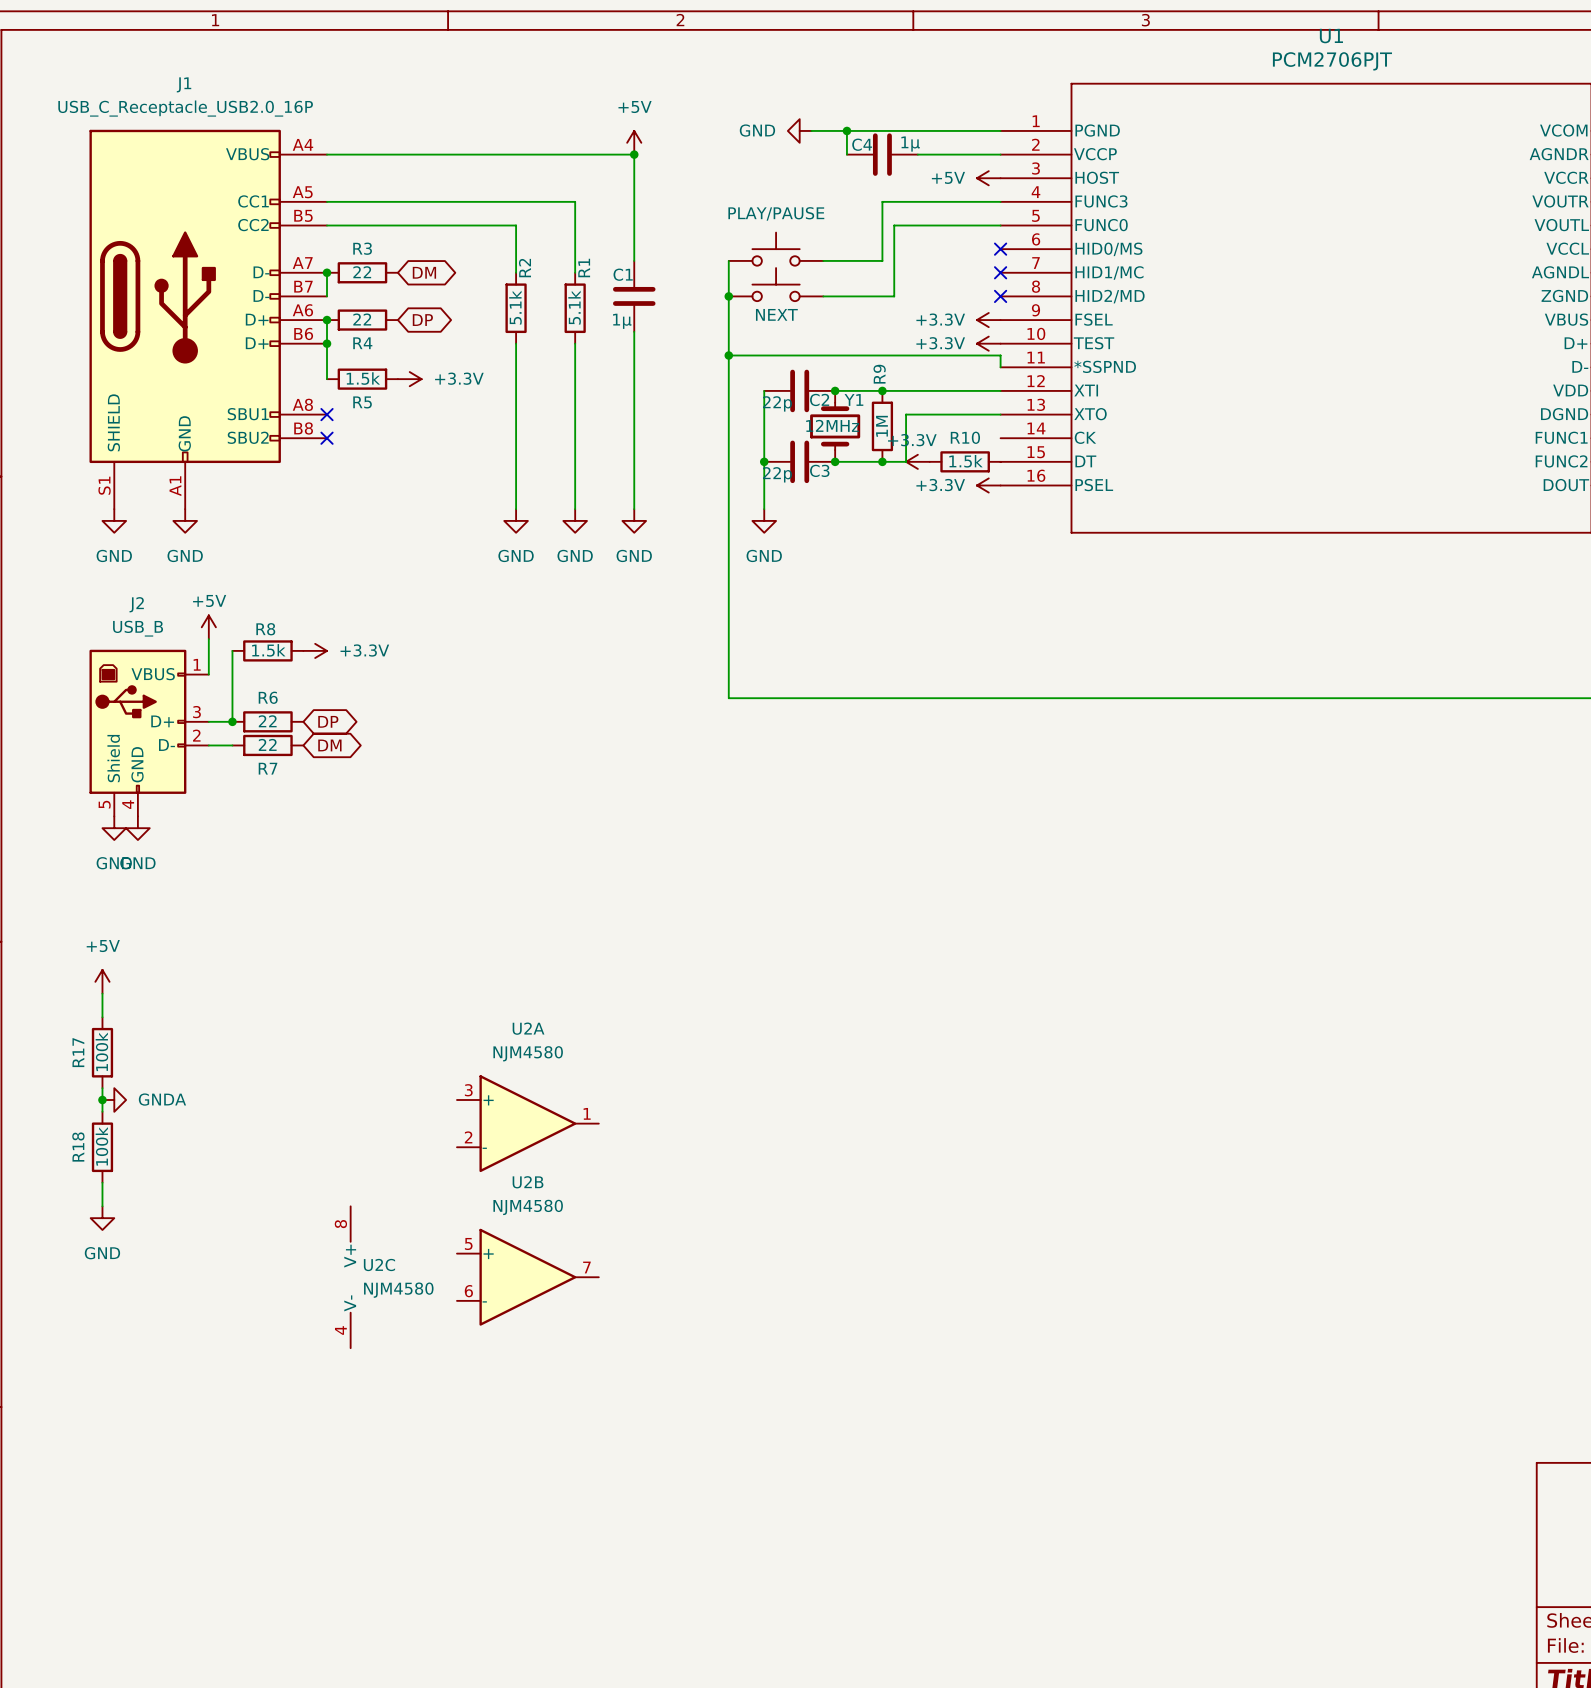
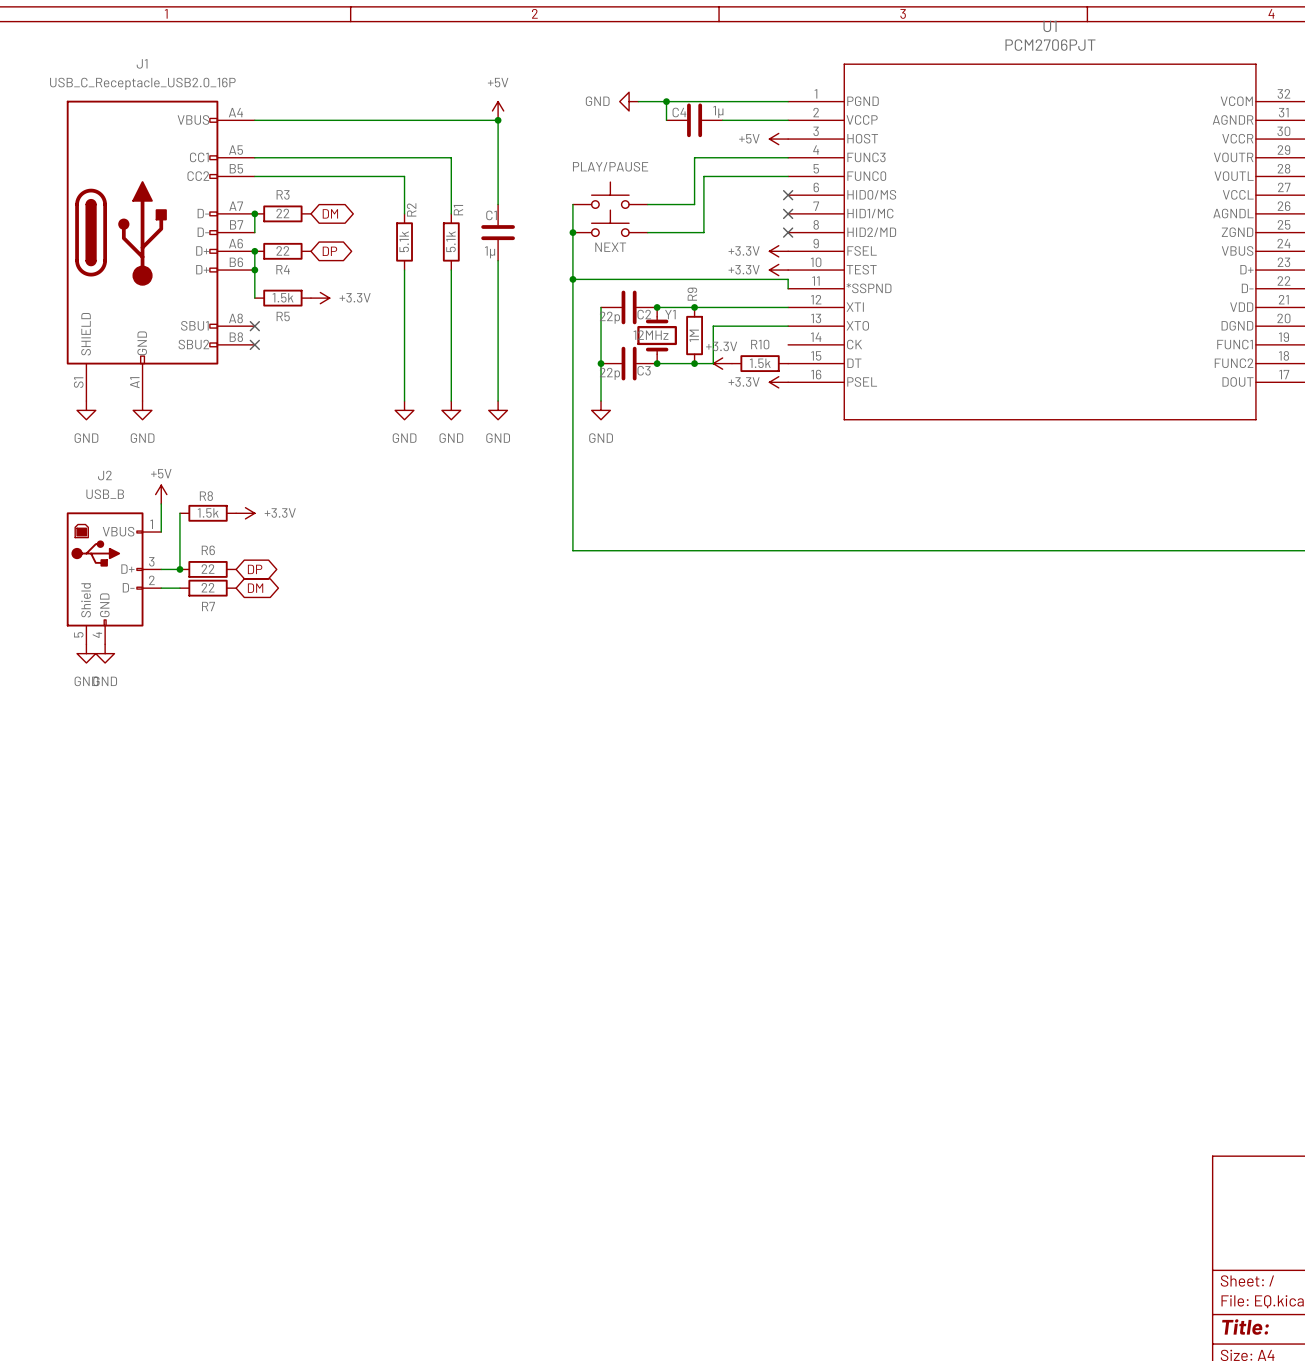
power symbol: +5V (102, 981) -> none
wire: (102, 993) (102, 1017) -> none
R17: 100k (102, 1052) -> none
wire: (102, 1088) (102, 1111) -> none
junction: (102, 1099) -> none
power symbol: GNDA (114, 1099) -> none
U2A: NJM4580 (527, 1123) -> none
R18: 100k (102, 1147) -> none
wire: (102, 1182) (102, 1206) -> none
power symbol: GND (102, 1218) -> none
U2C: NJM4580 (350, 1277) -> none
U2B: NJM4580 (527, 1277) -> none

